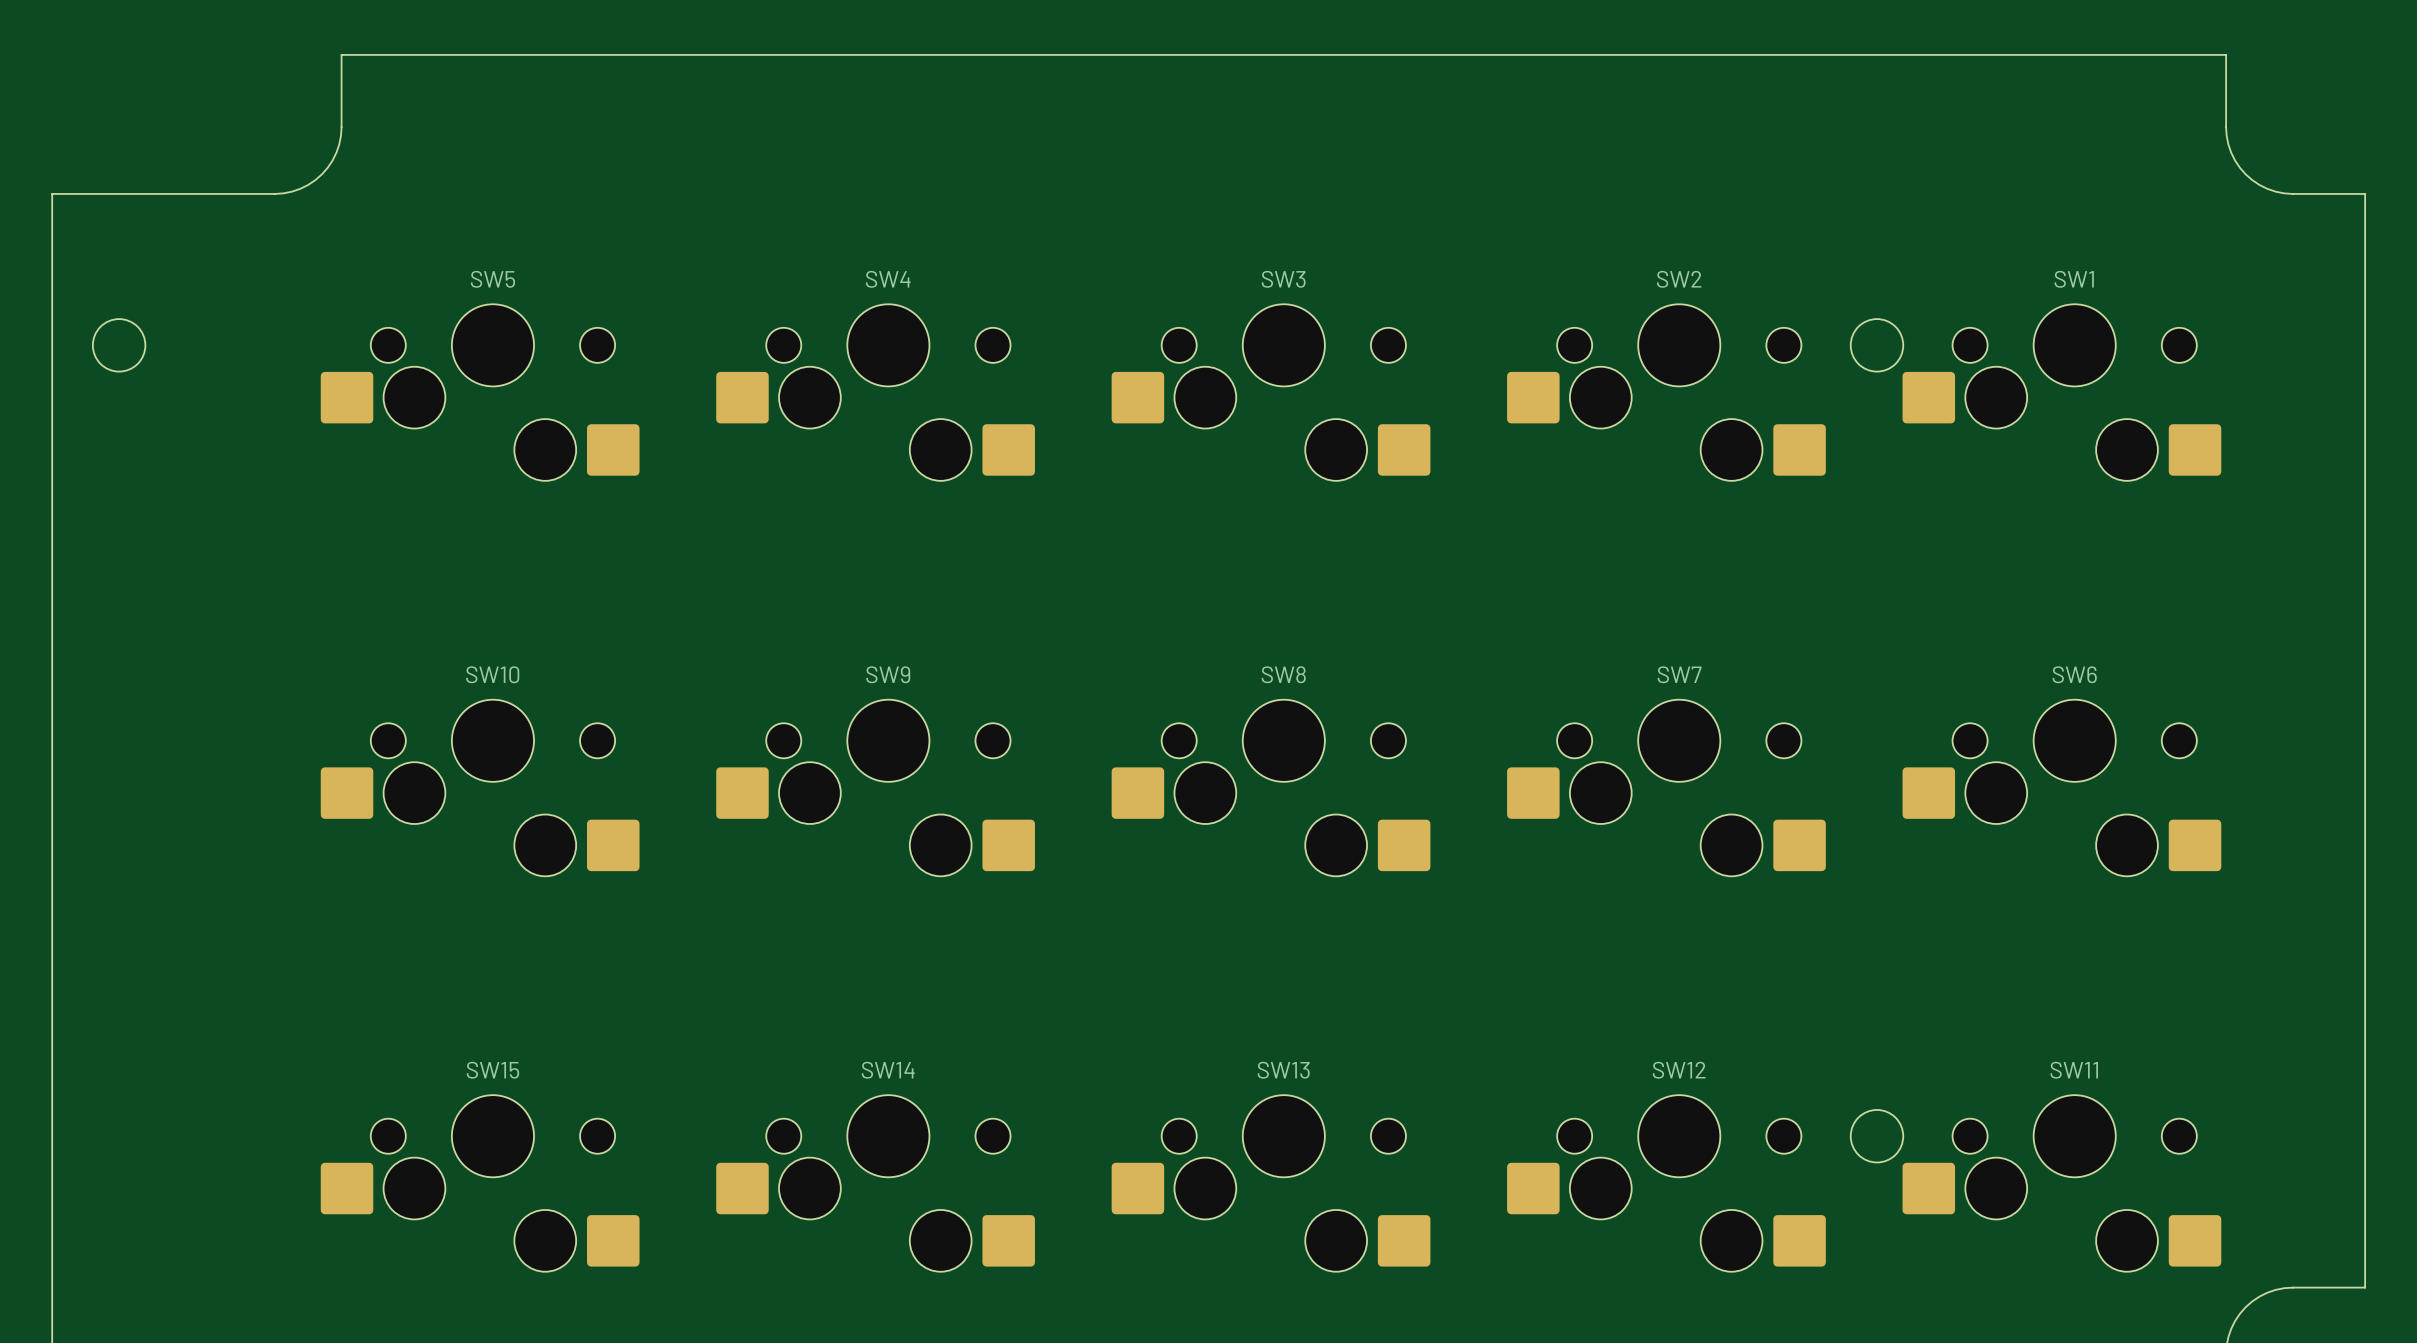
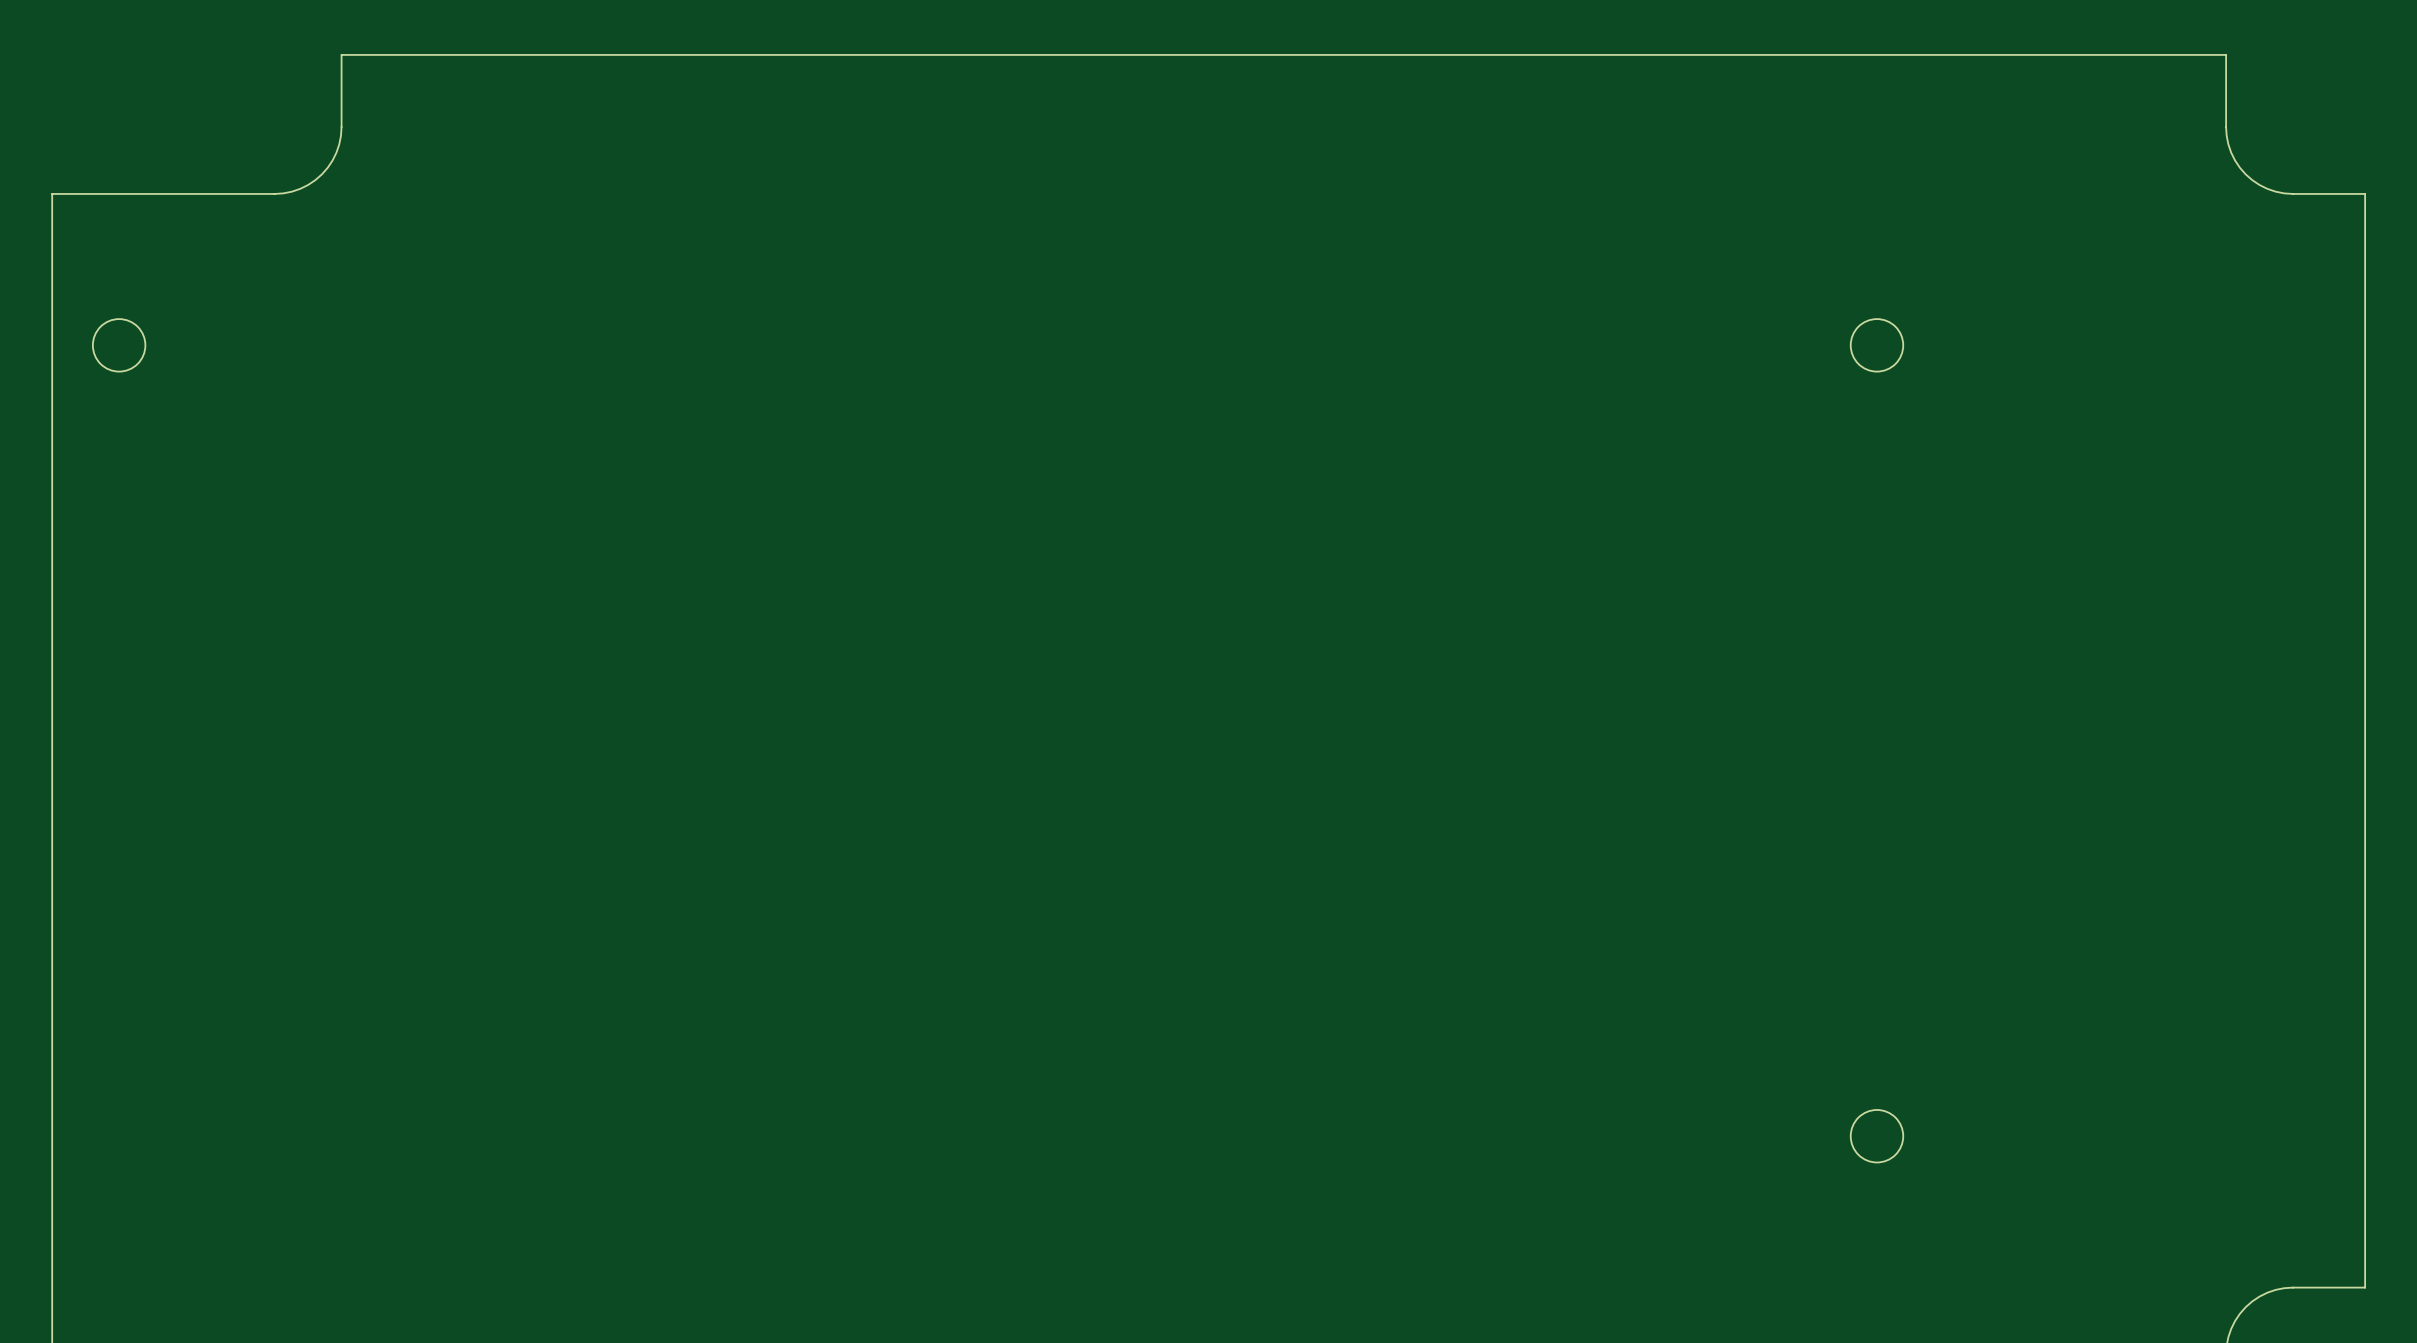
SW5: (480, 392) -> none
SW4: (875, 392) -> none
SW3: (1271, 392) -> none
SW2: (1666, 392) -> none
SW1: (2061, 392) -> none
SW10: (480, 788) -> none
SW9: (875, 788) -> none
SW8: (1271, 788) -> none
SW7: (1666, 788) -> none
SW6: (2061, 788) -> none
SW15: (480, 1183) -> none
SW14: (875, 1183) -> none
SW13: (1271, 1183) -> none
SW12: (1666, 1183) -> none
SW11: (2061, 1183) -> none

